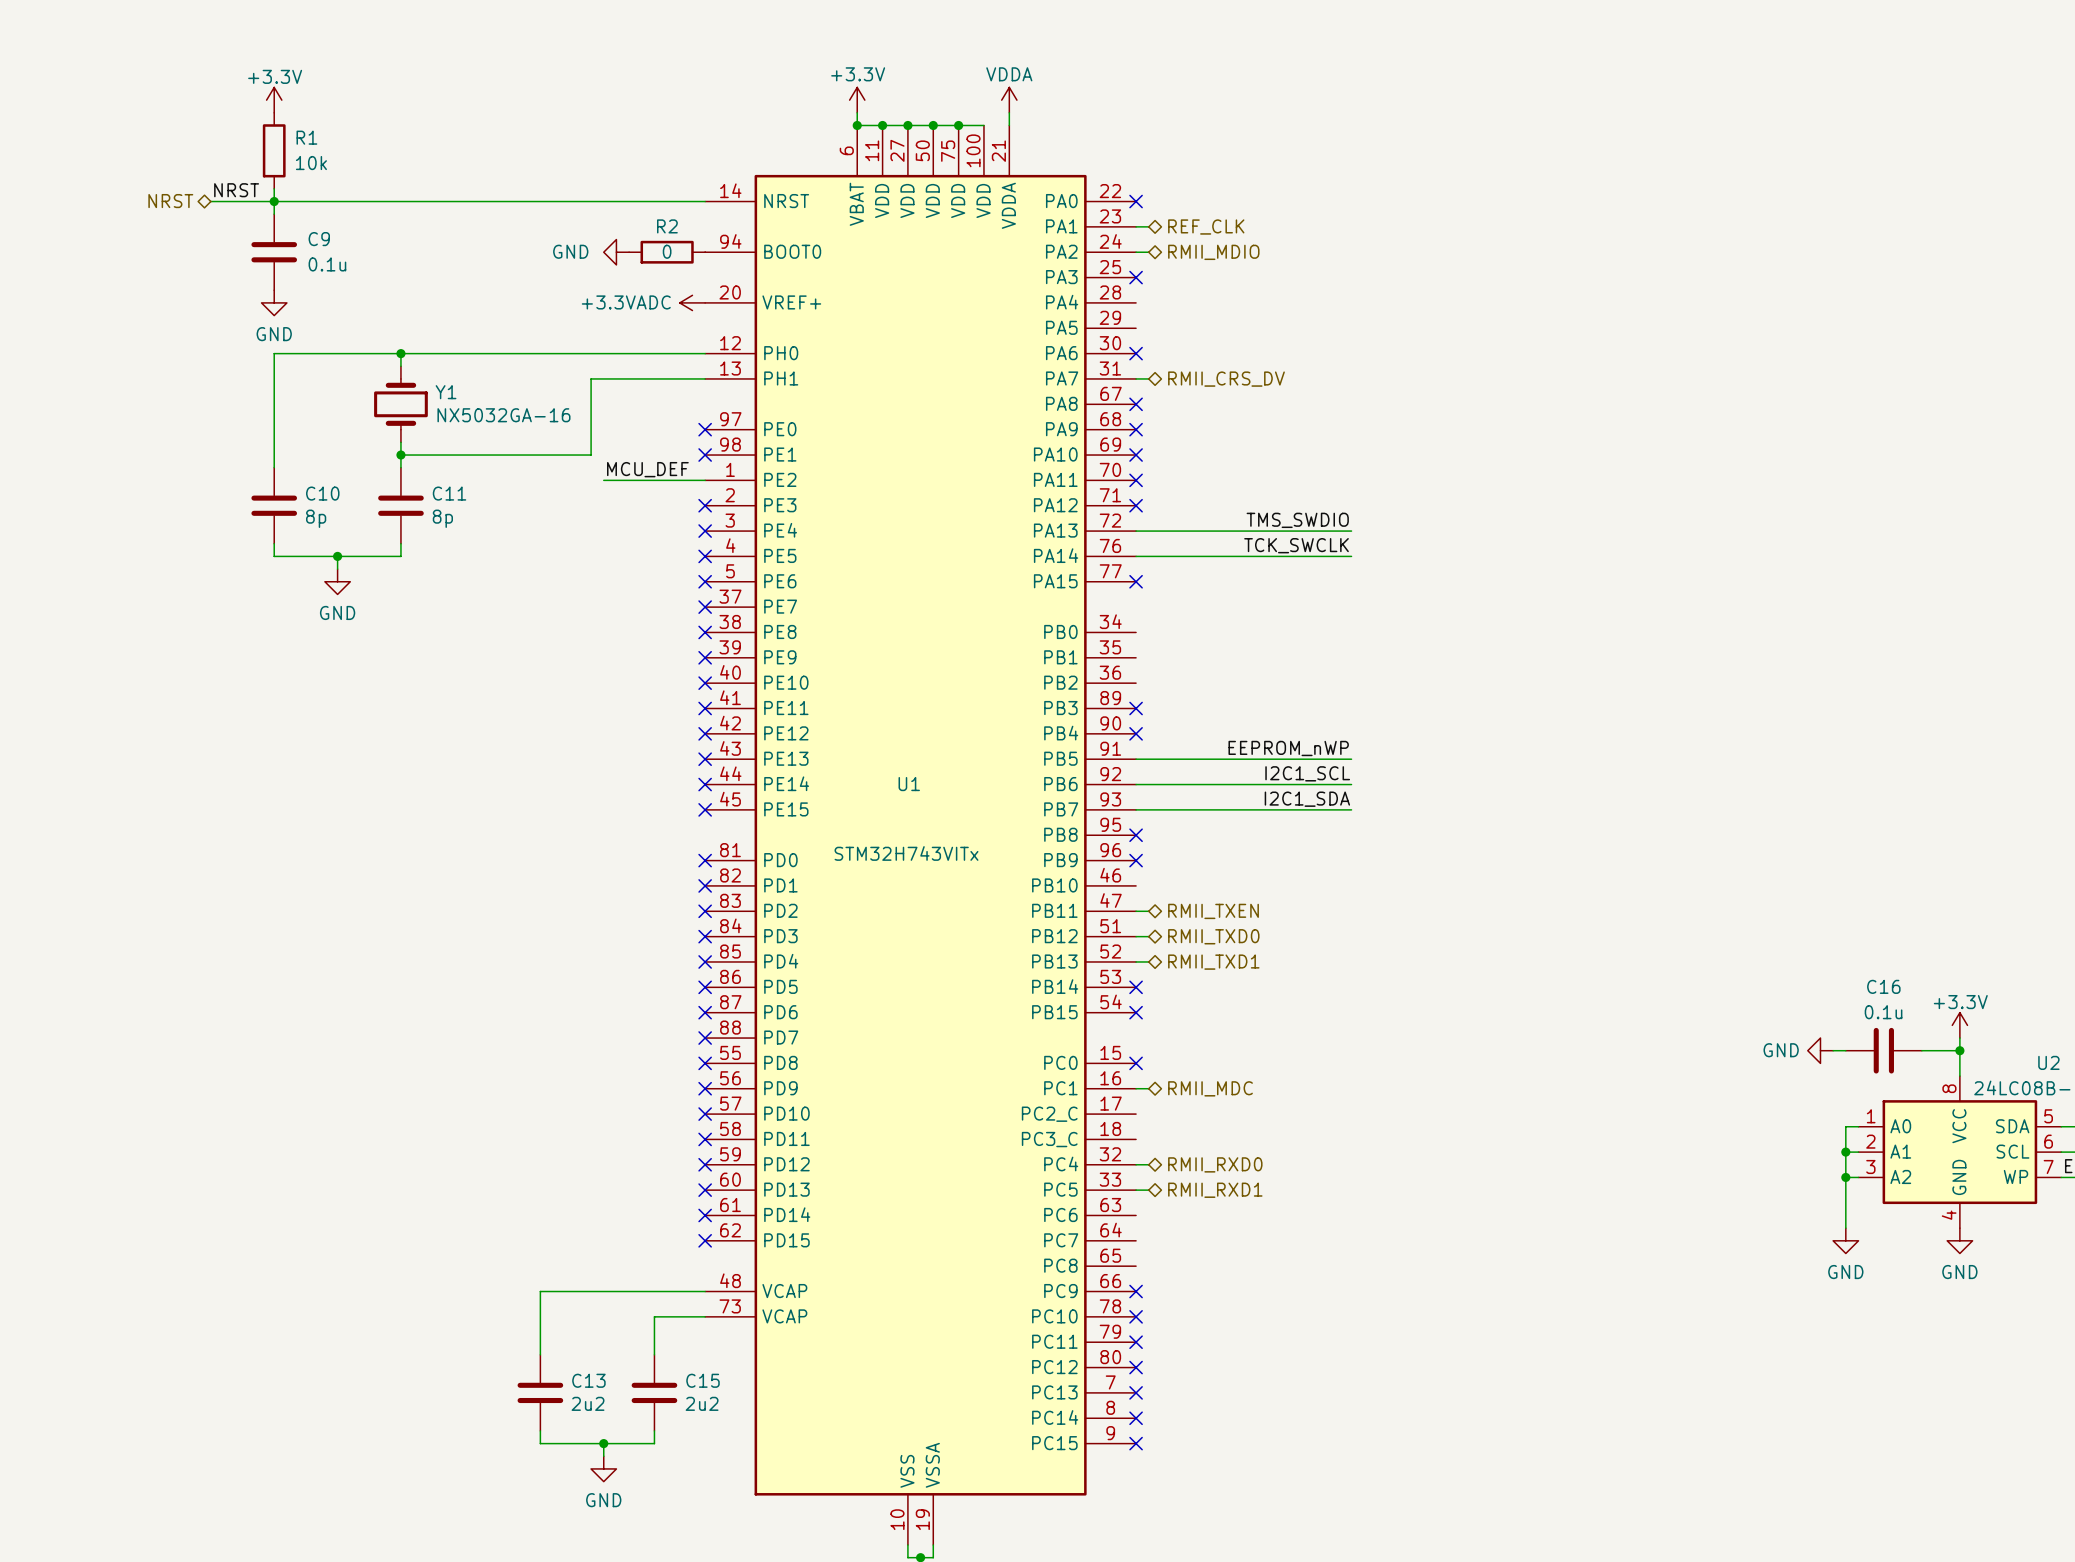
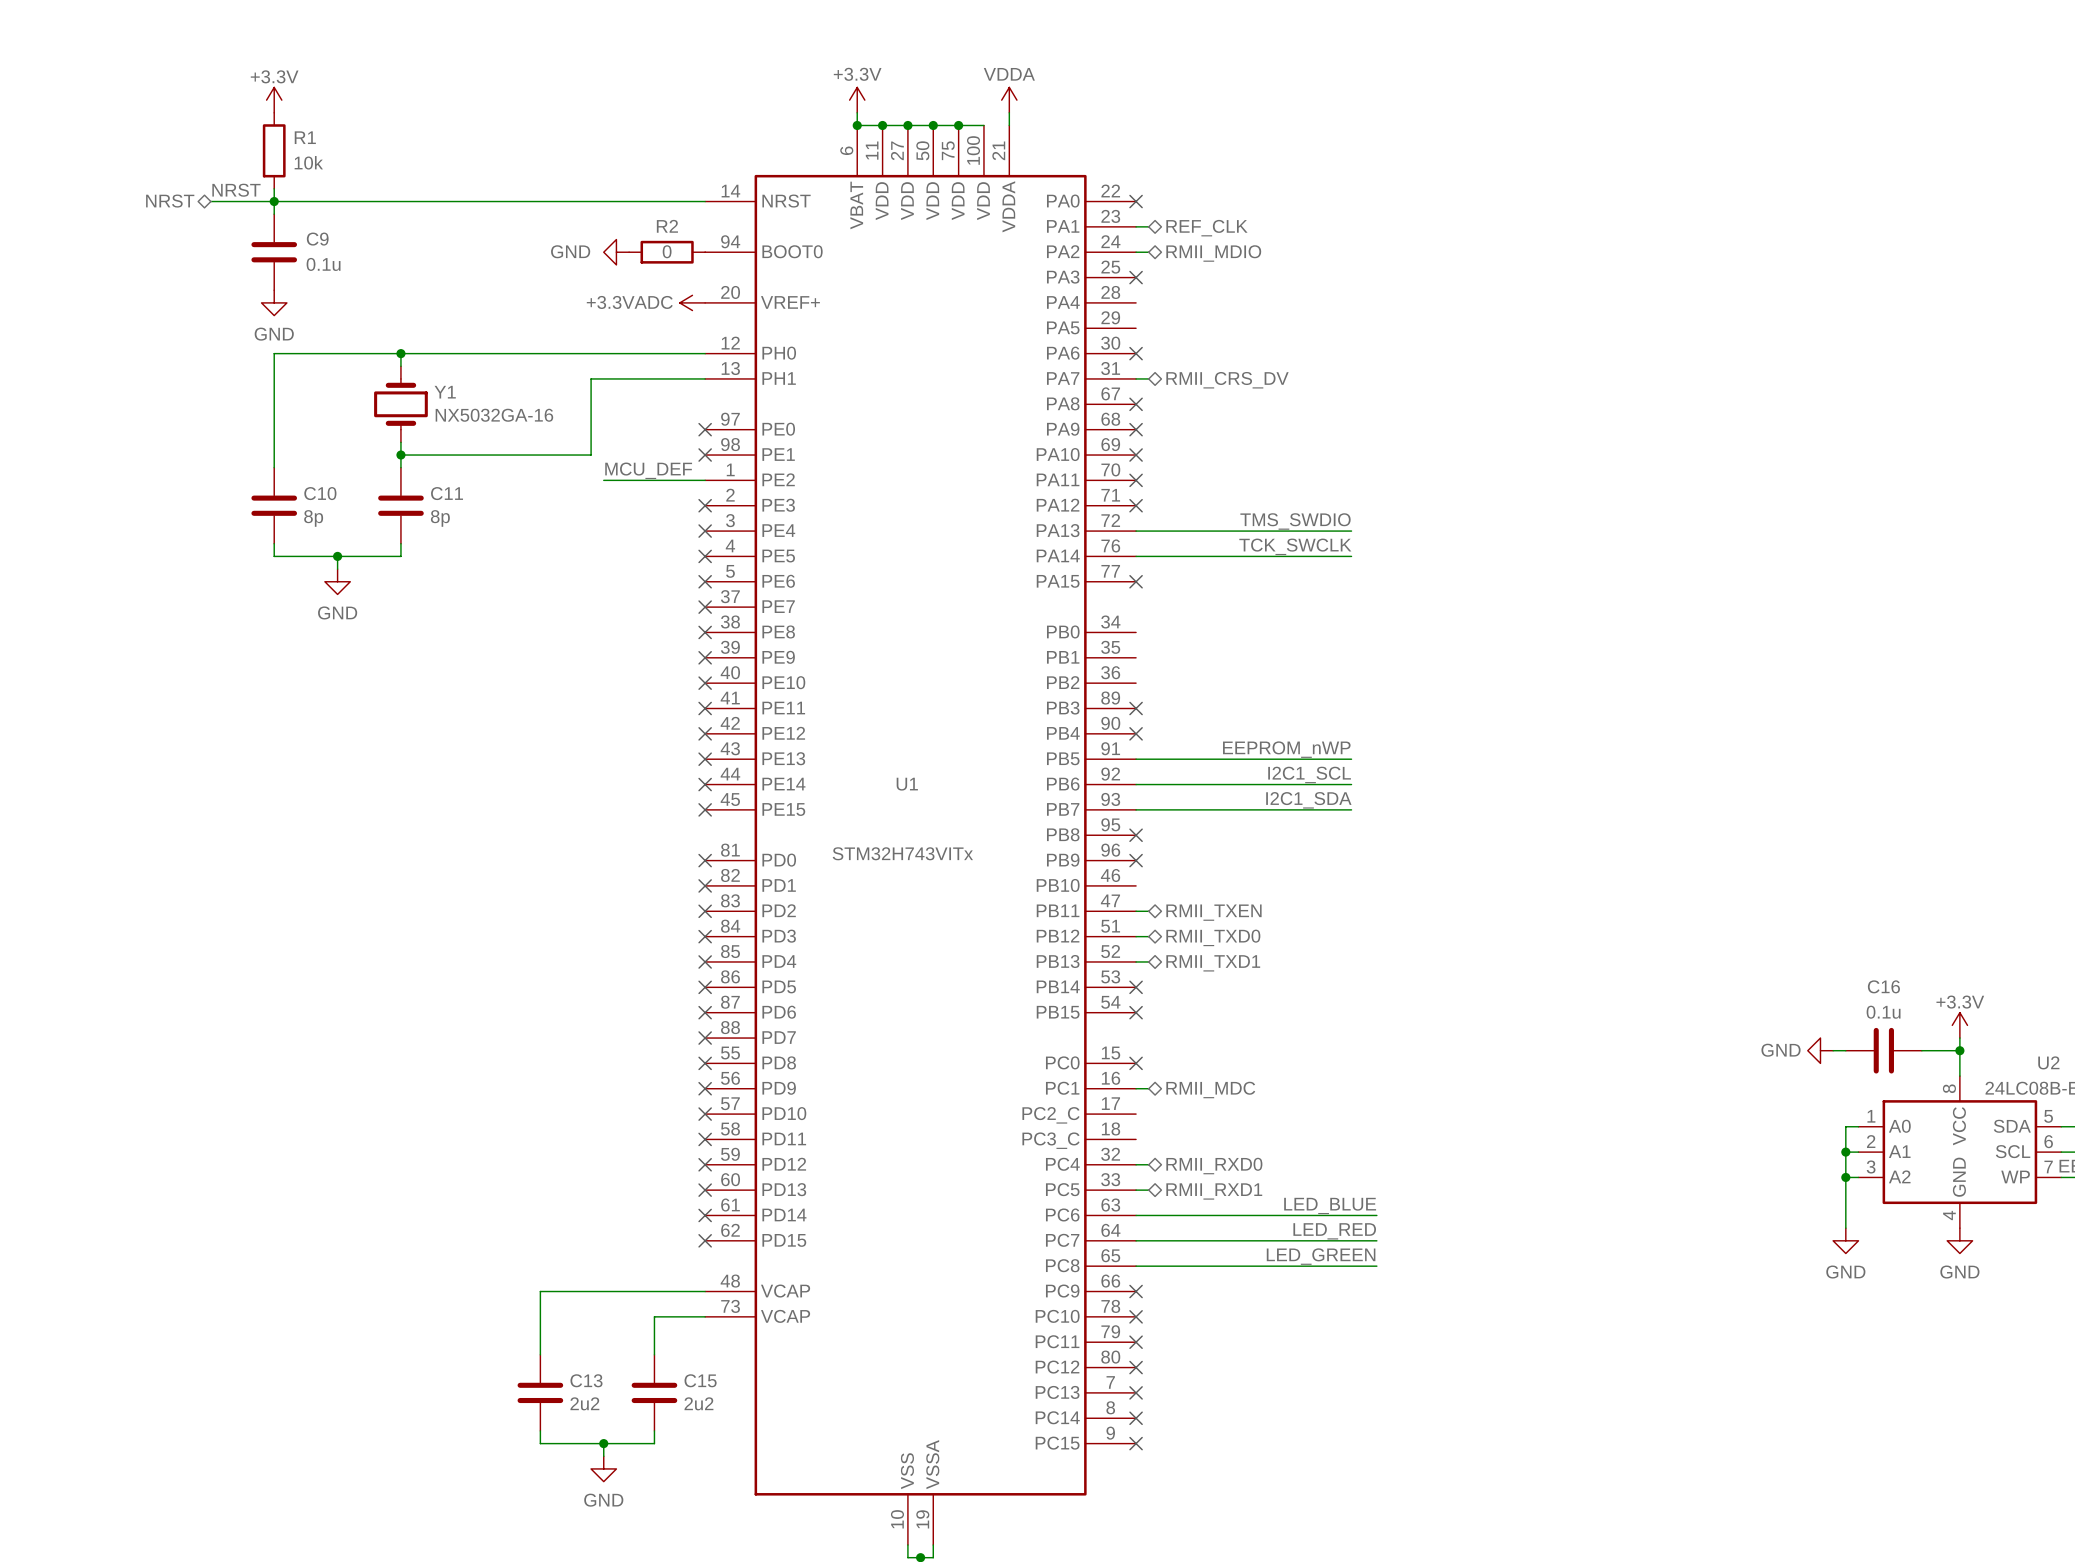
label: none -> LED_BLUE (1330, 1205)
wire: none -> (1136, 1215) (1376, 1215)
label: none -> LED_RED (1334, 1231)
wire: none -> (1136, 1240) (1376, 1240)
label: none -> LED_GREEN (1321, 1256)
wire: none -> (1136, 1266) (1376, 1266)

